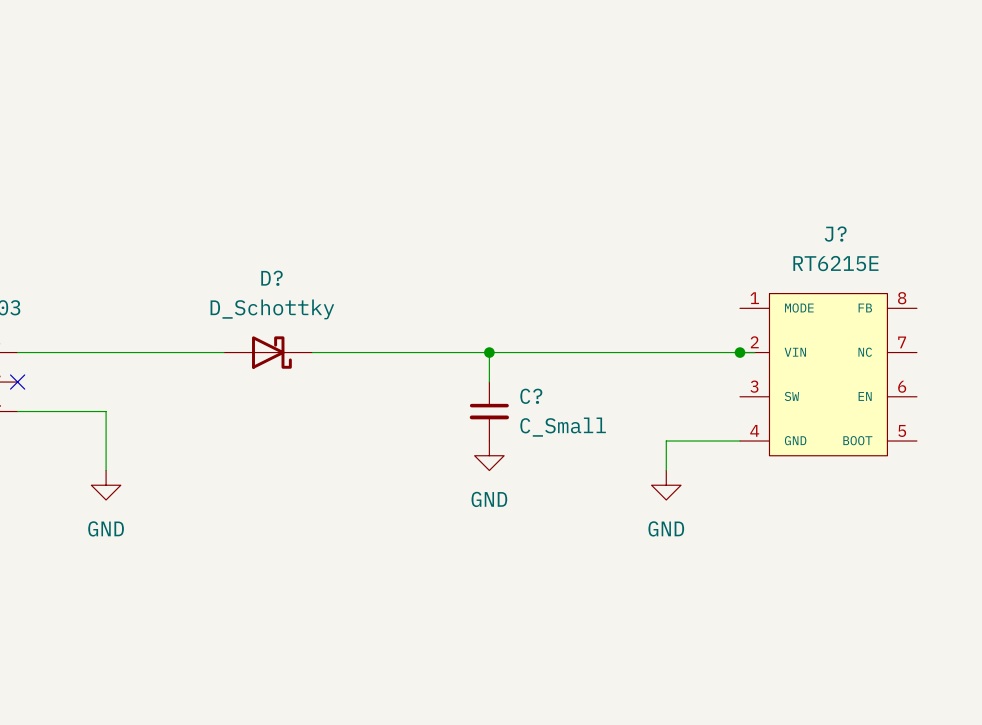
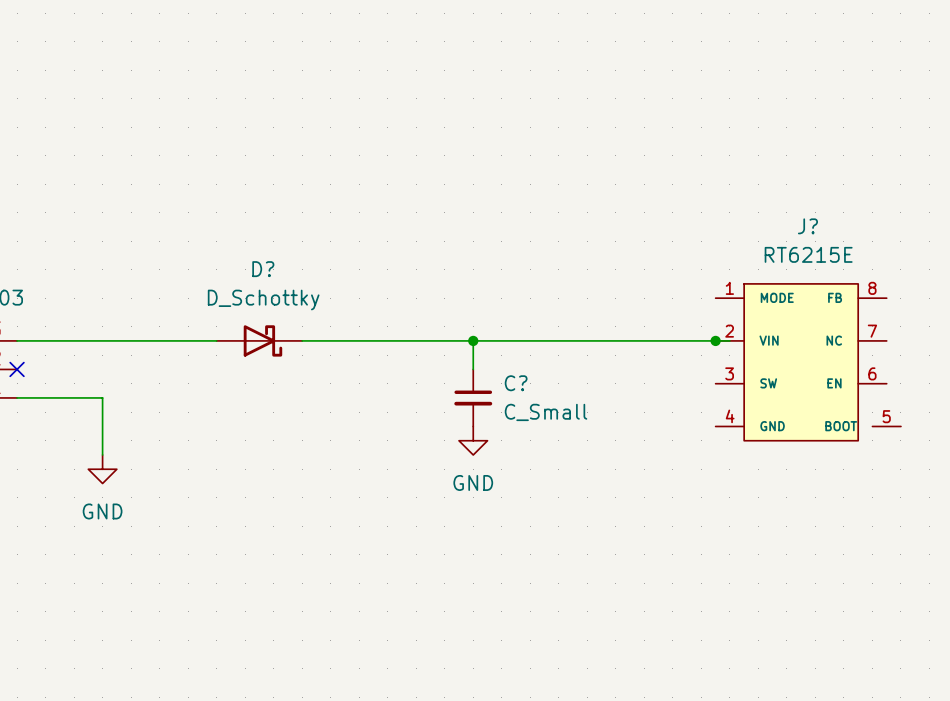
J? symbol: [740, 293, 917, 456] -> [715, 283, 901, 441]
wire: (740, 441) (666, 441) (666, 470) -> none
power symbol: GND (666, 485) -> none

